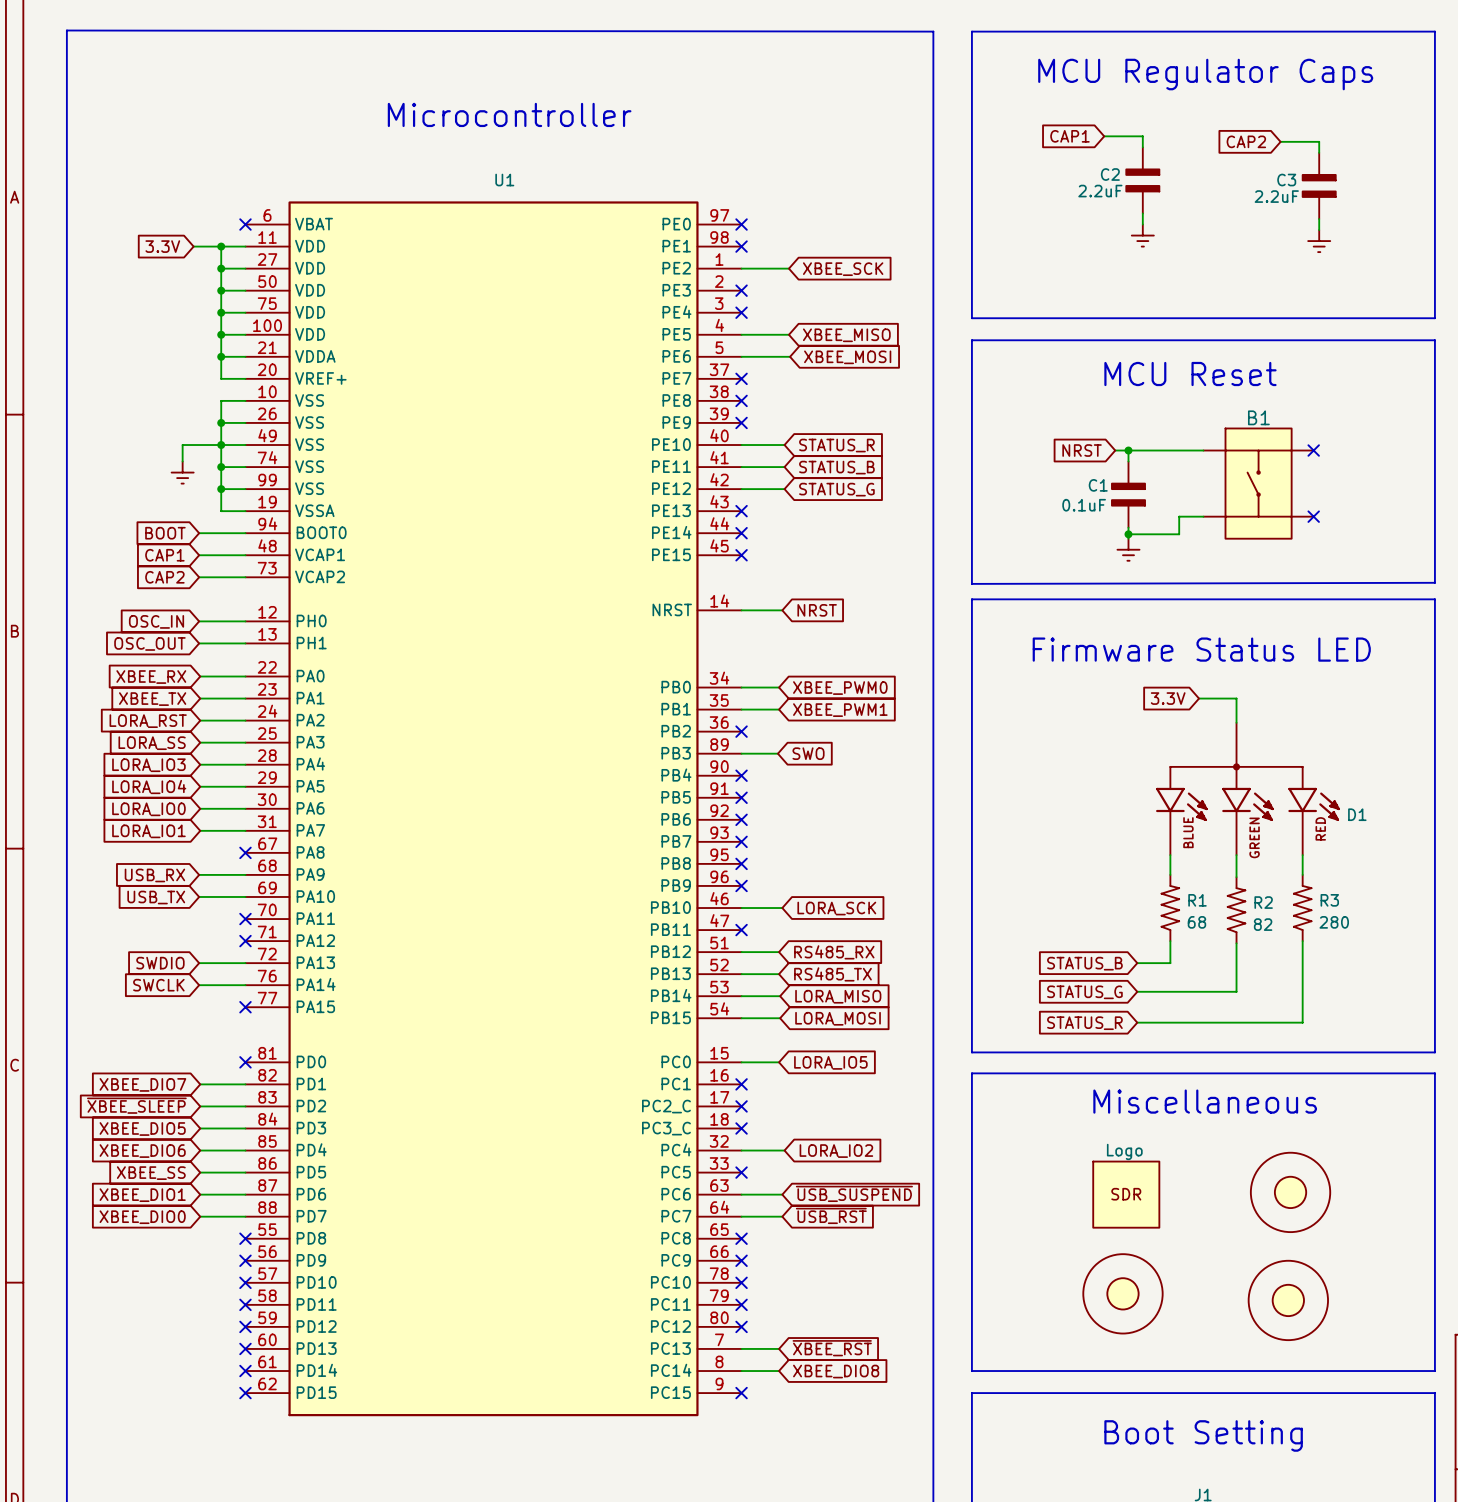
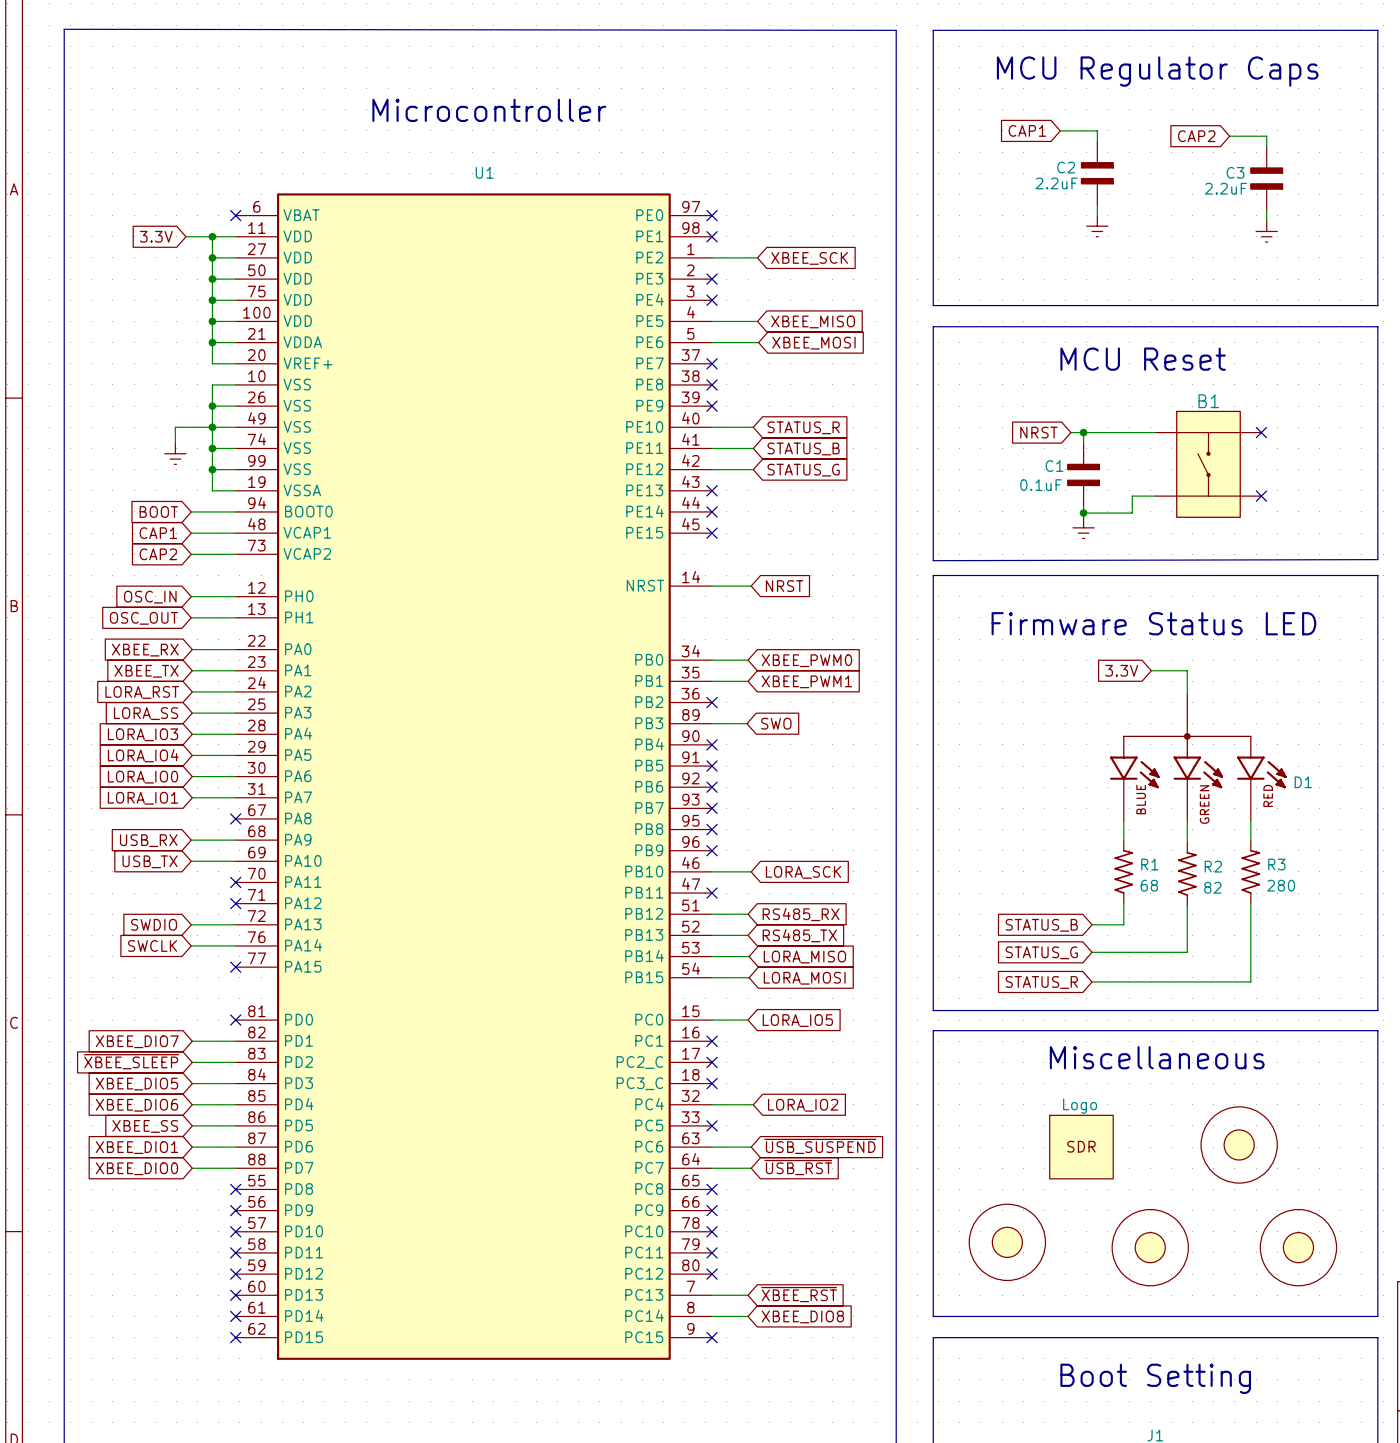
part: none -> (1007, 1242)
part: (1122, 1293) -> none
part: none -> (1150, 1247)
part: none -> (1298, 1247)
part: (1288, 1300) -> none

